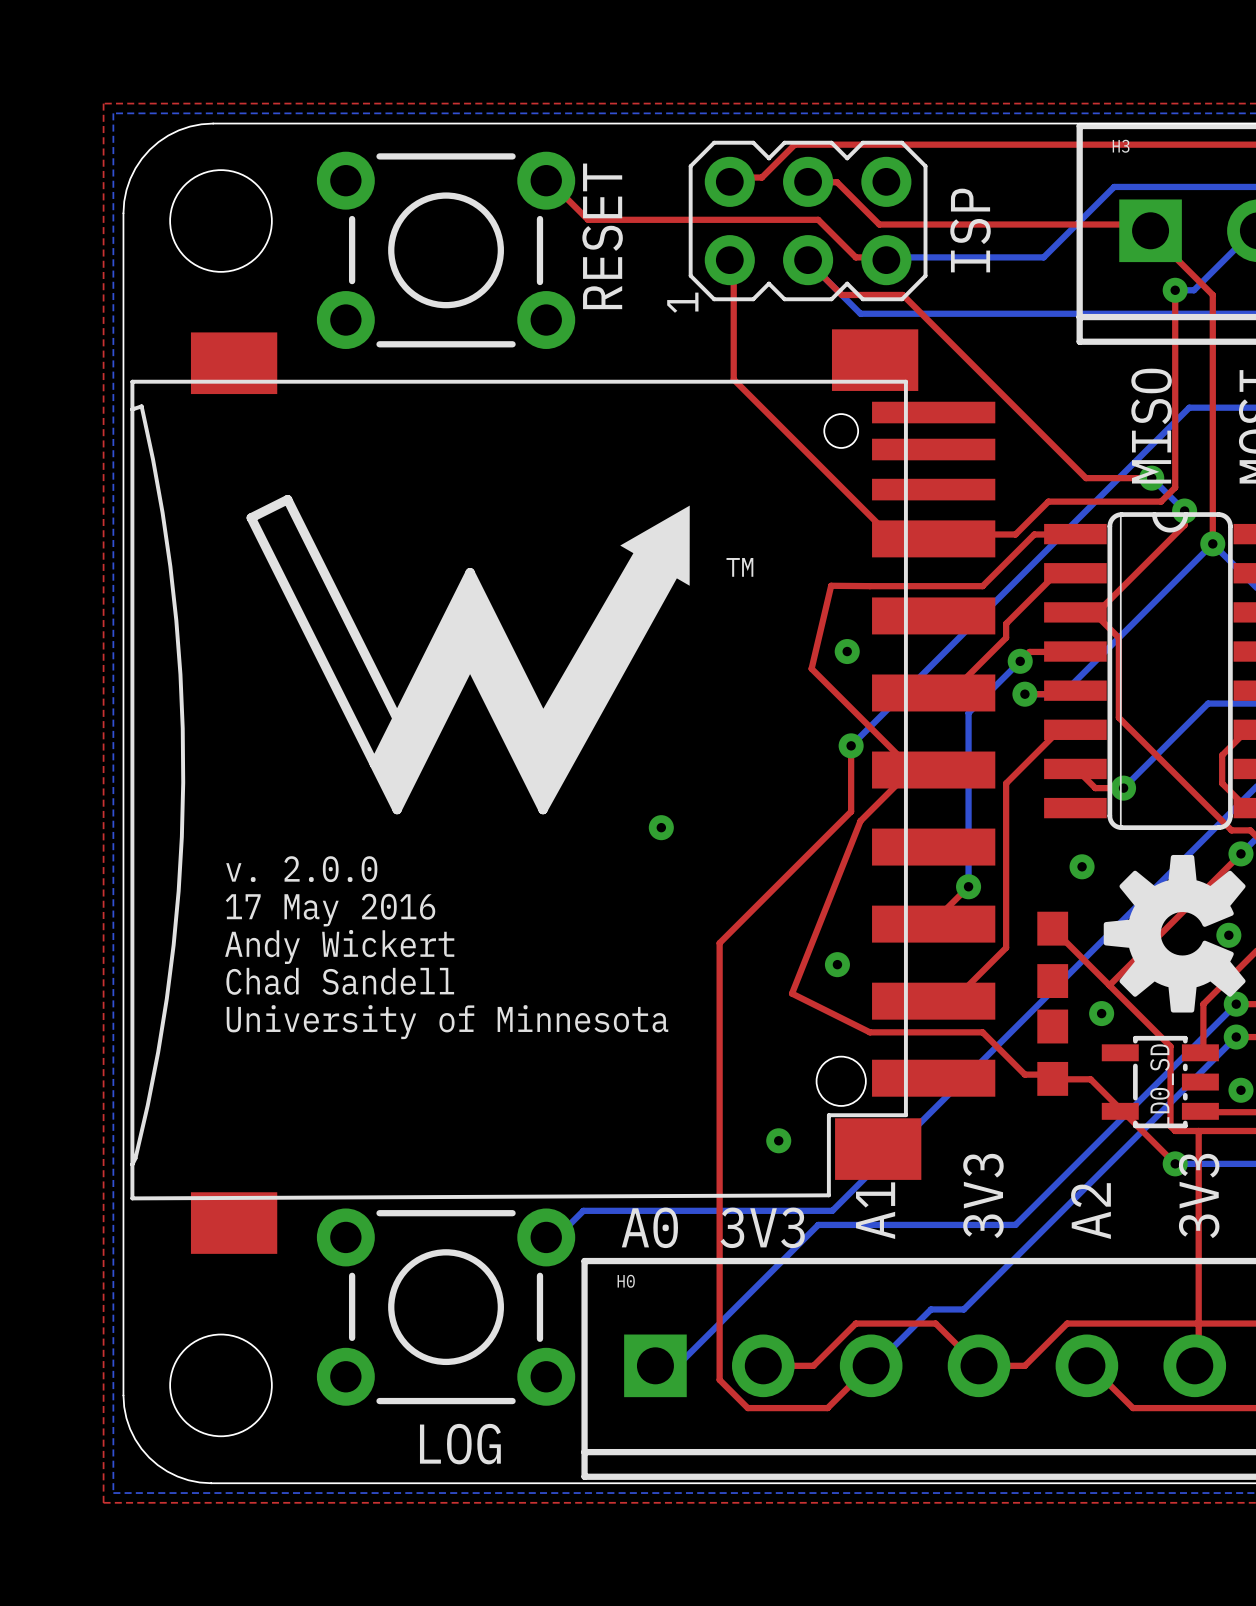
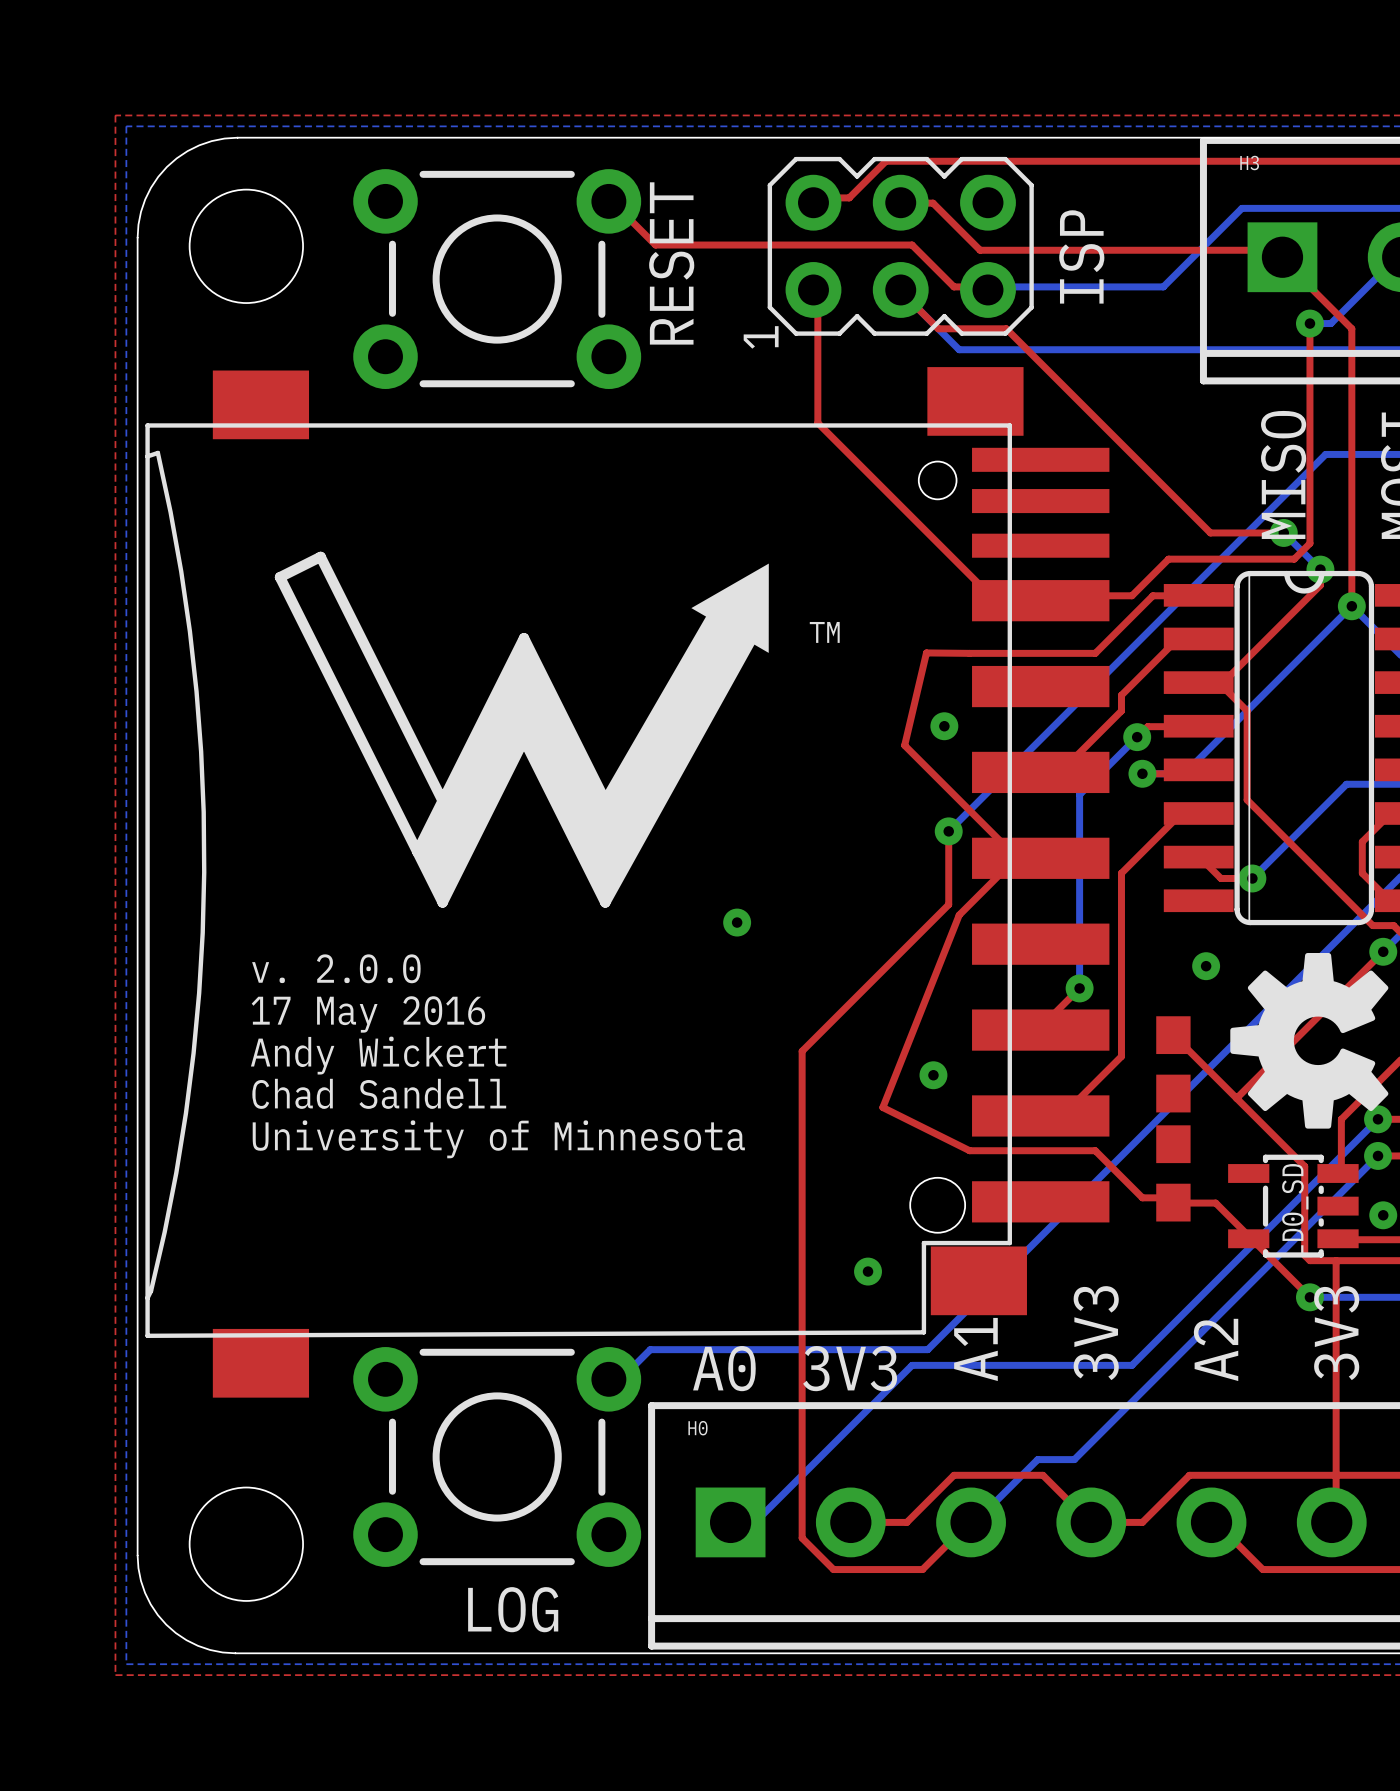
via: (1228, 935) -> none
via: (1101, 1013) -> none

